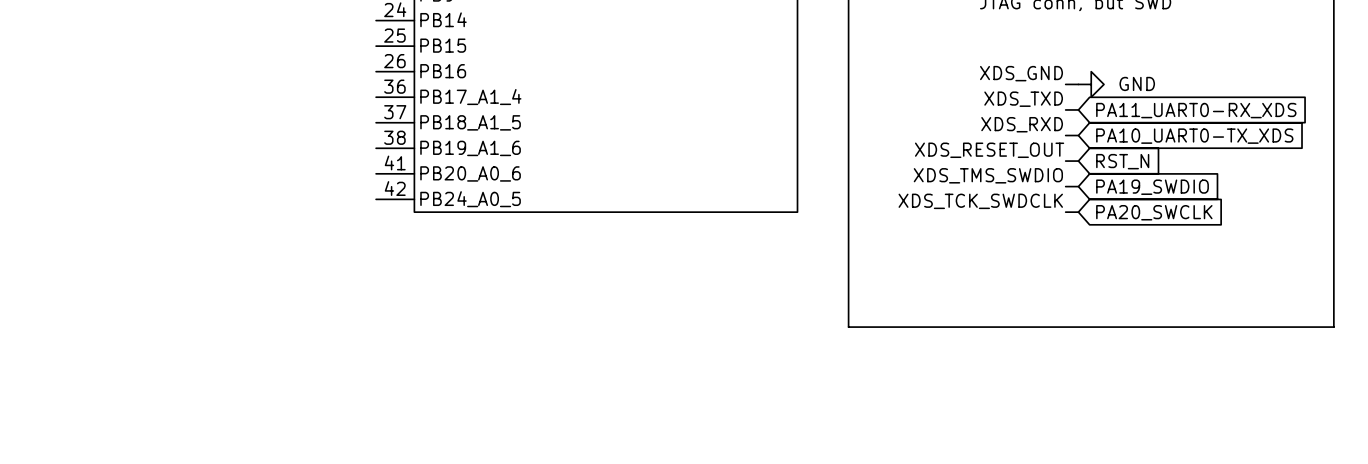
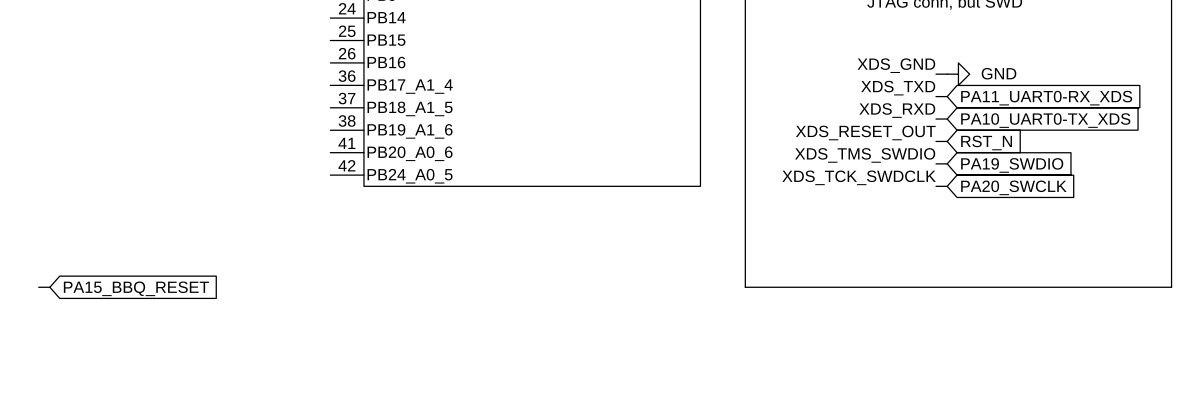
wire: none -> (38, 287) (49, 287)
global label: none -> PA15_BBQ_RESET (136, 288)

